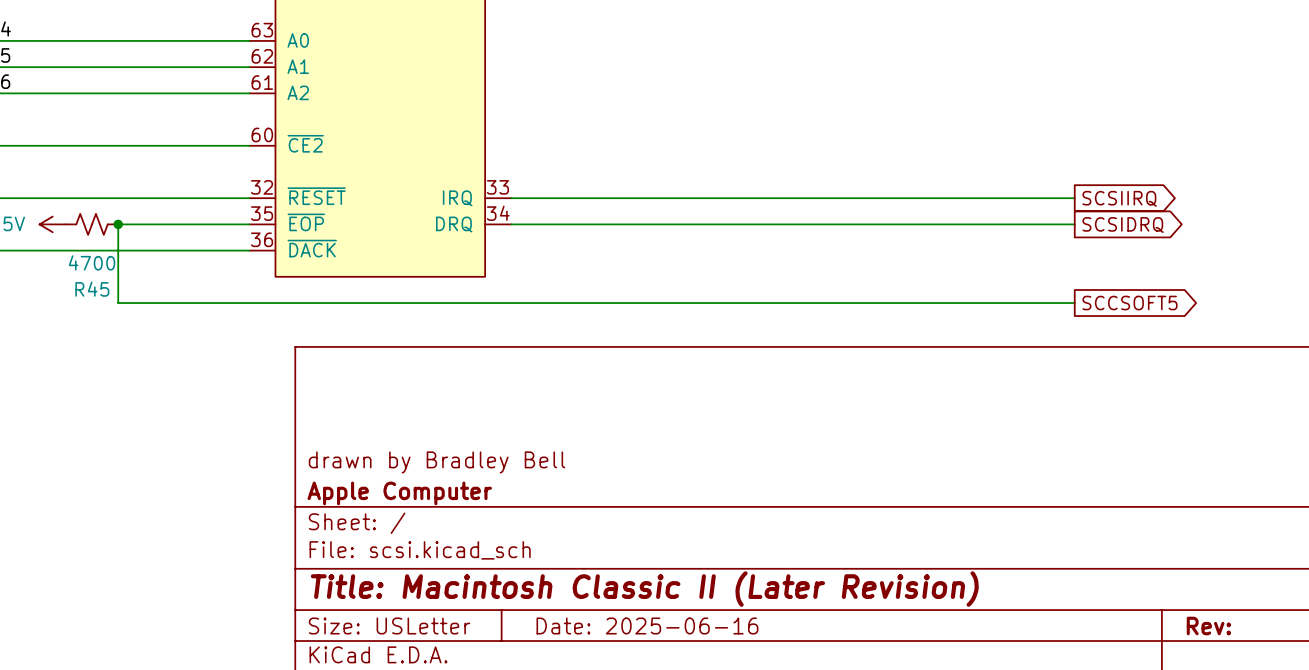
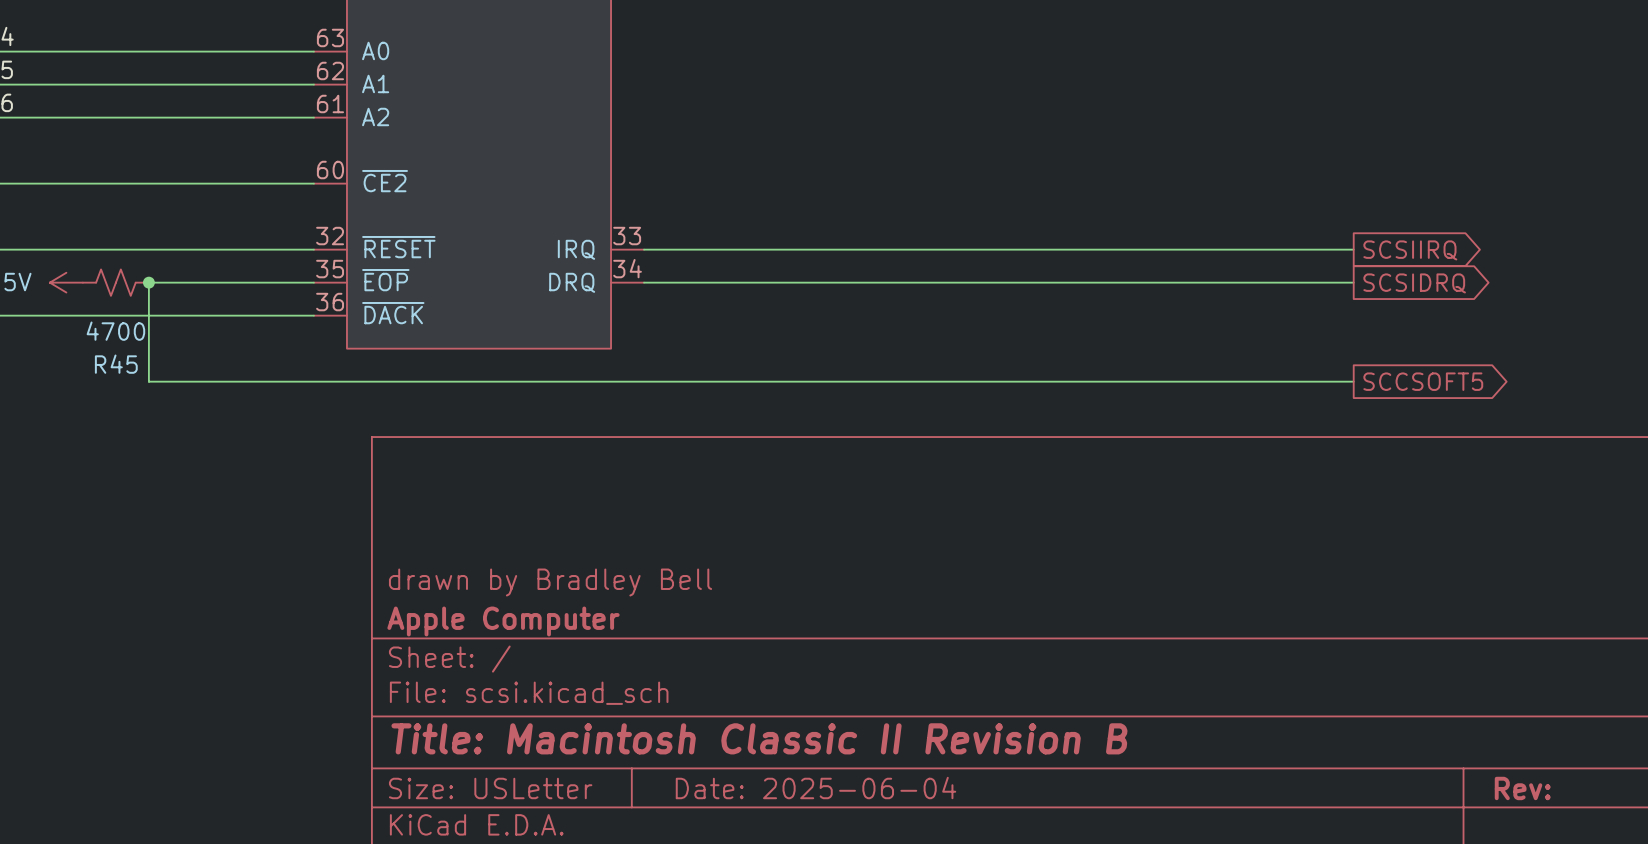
title block: Title: Macintosh Classic II (Later Revision) (644, 589) -> Title: Macintosh Classic II Revision B (759, 738)
title block: Date: 2025-06-16 (647, 625) -> Date: 2025-06-04 (815, 788)

